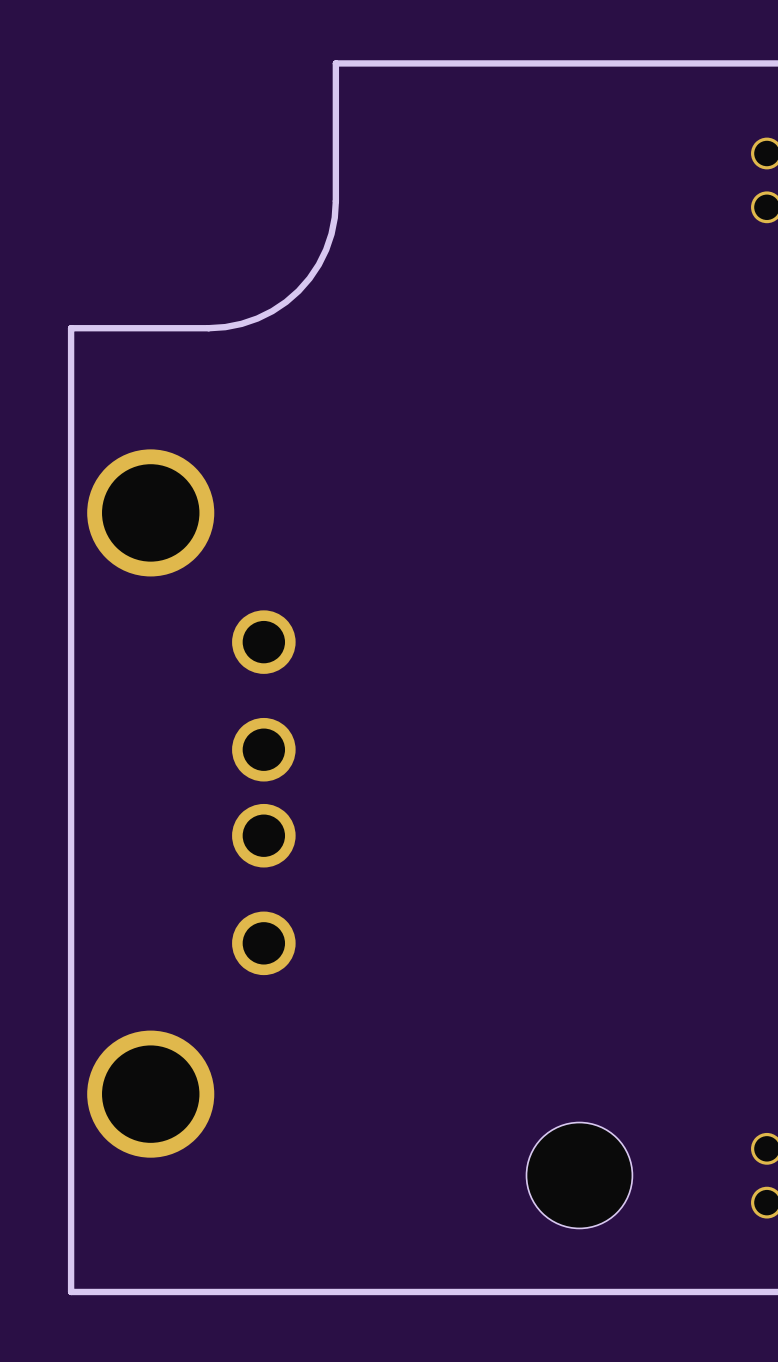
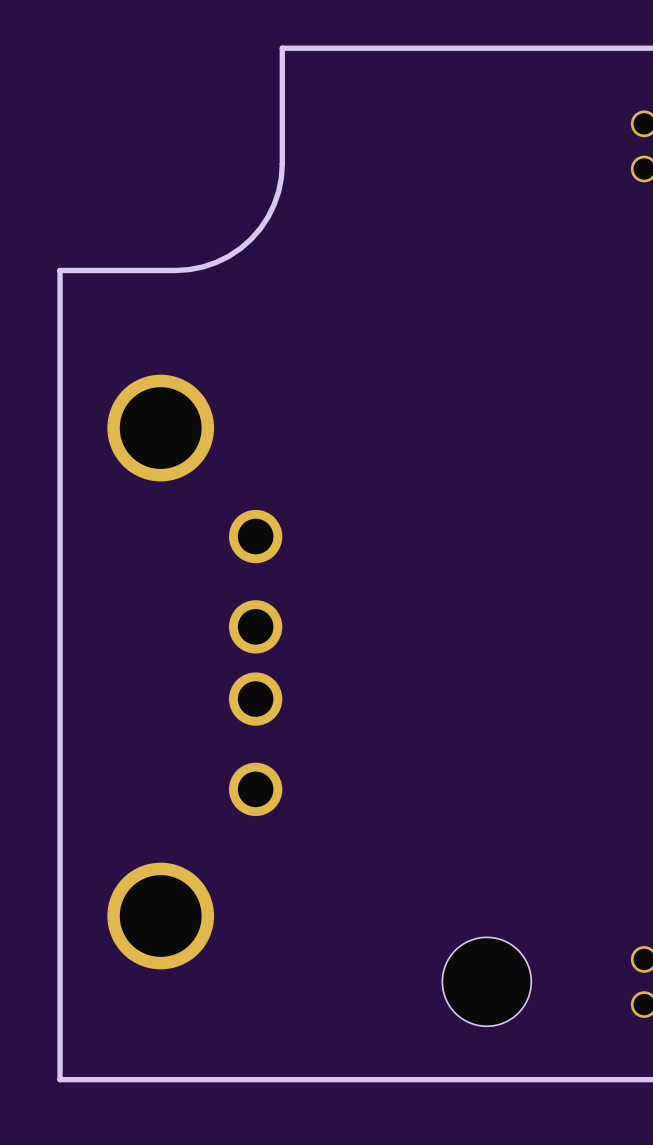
part position: (191, 803) -> (194, 672)

